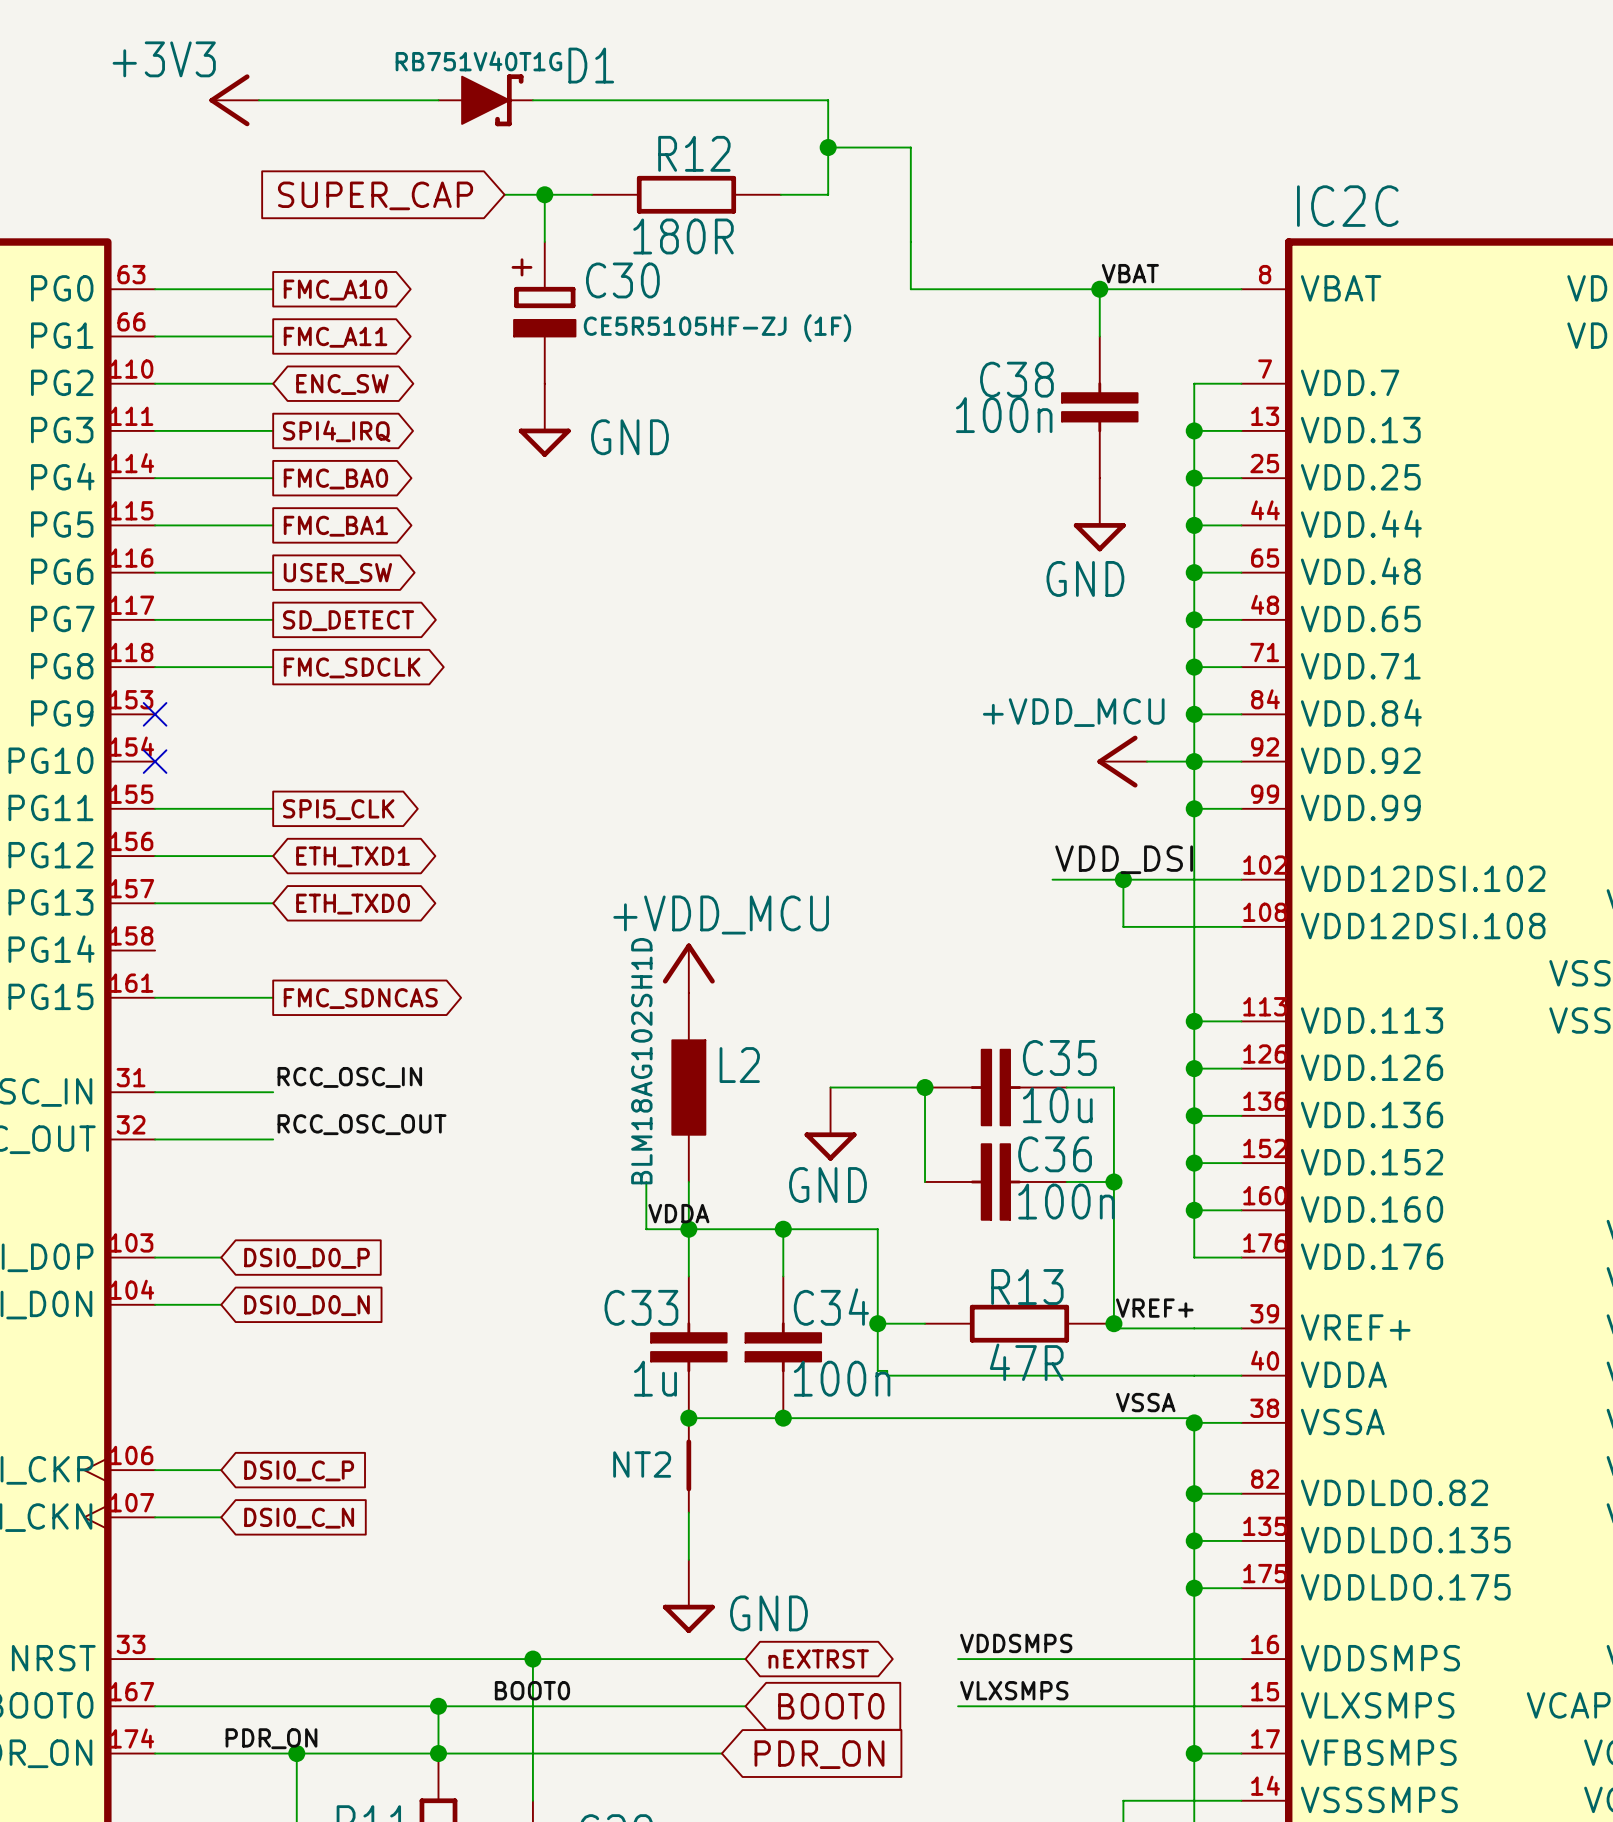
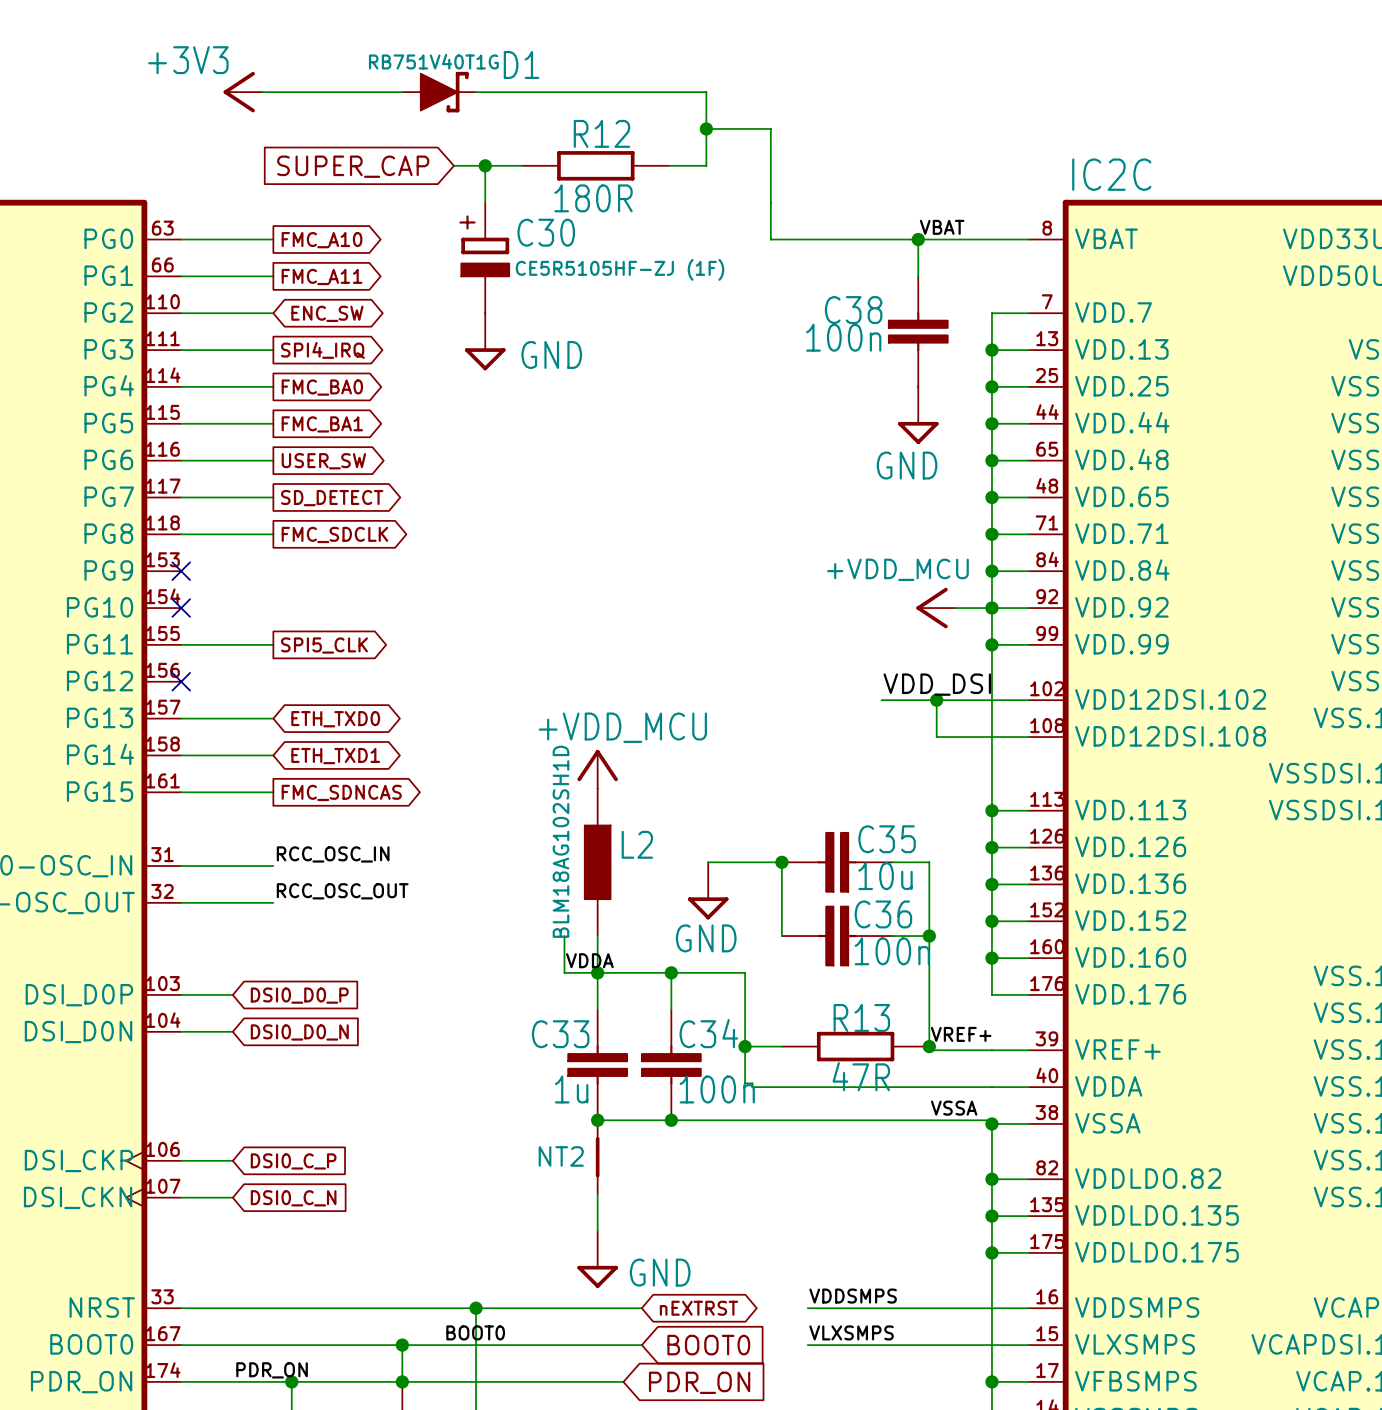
wire: (155, 856) (273, 856) -> (181, 755) (273, 755)
no-connect mark: none -> (181, 681)
global label position: ETH_TXD1 (353, 856) -> ETH_TXD1 (335, 756)

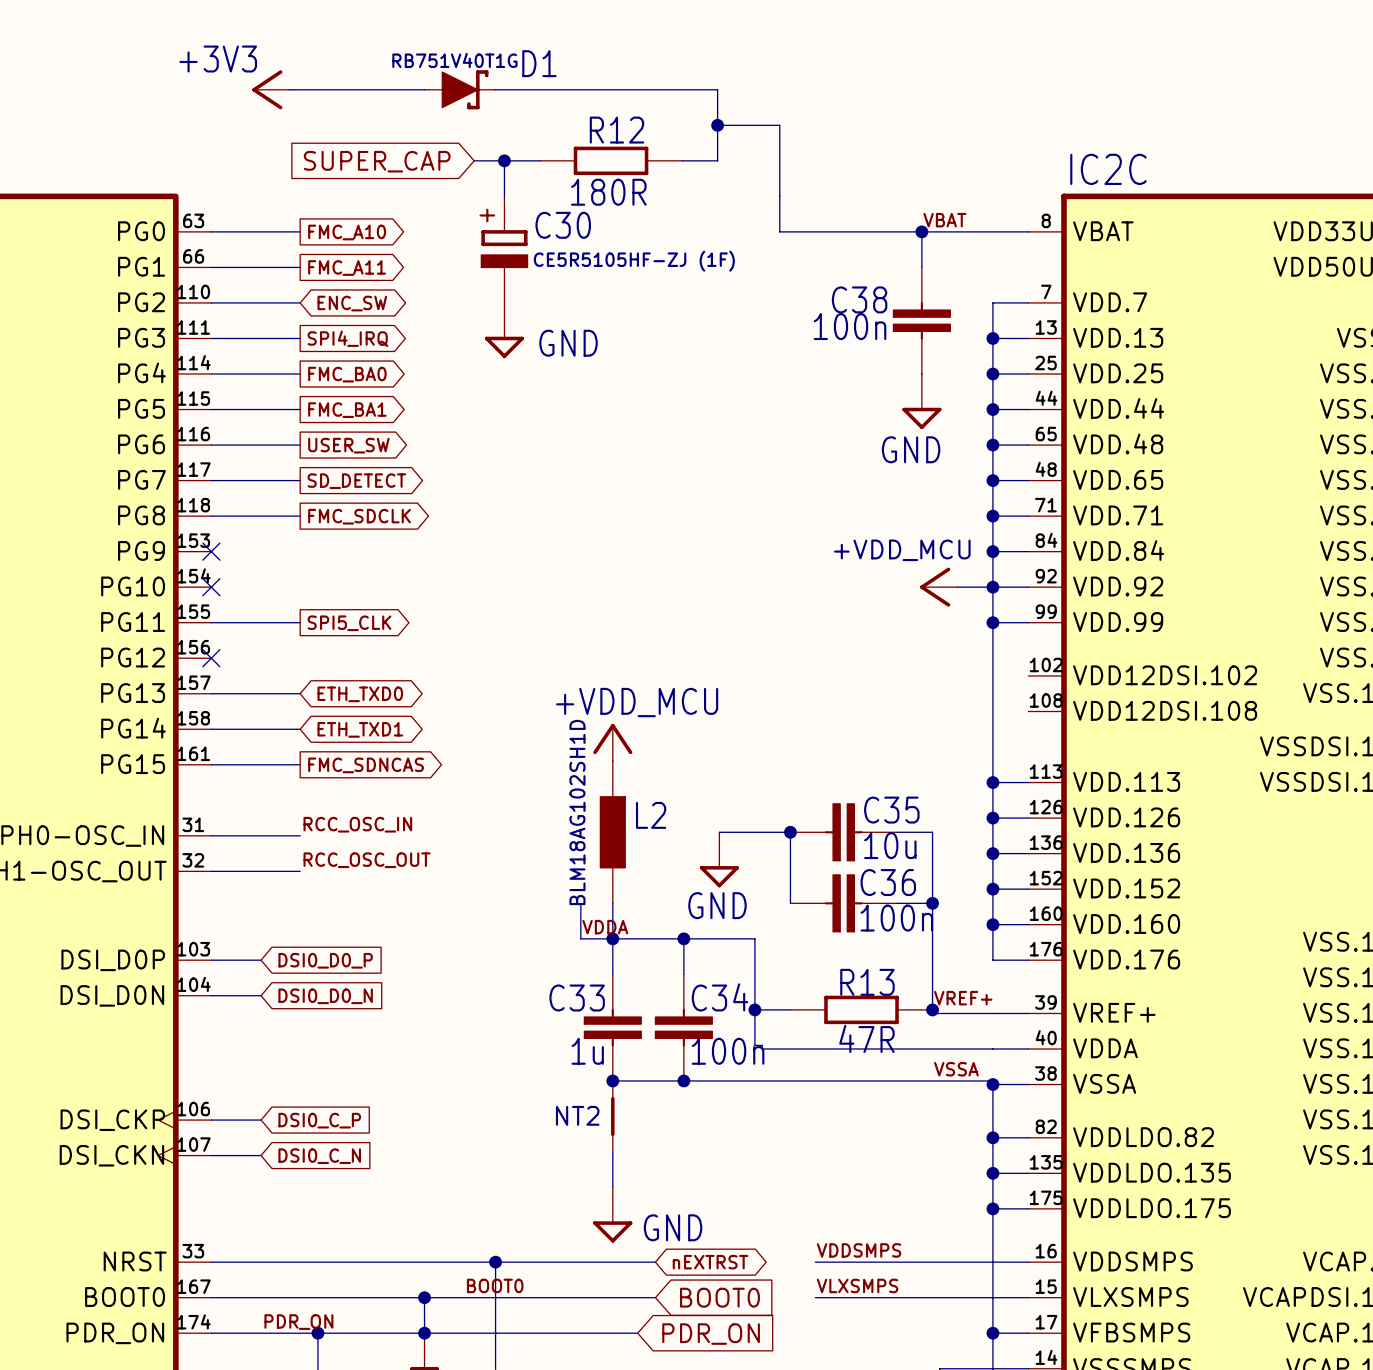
label: VDD_DSI (937, 684) -> none
wire: (881, 700) (1028, 700) -> none
wire: (936, 700) (936, 737) (1028, 737) -> none
junction: (936, 700) -> none

